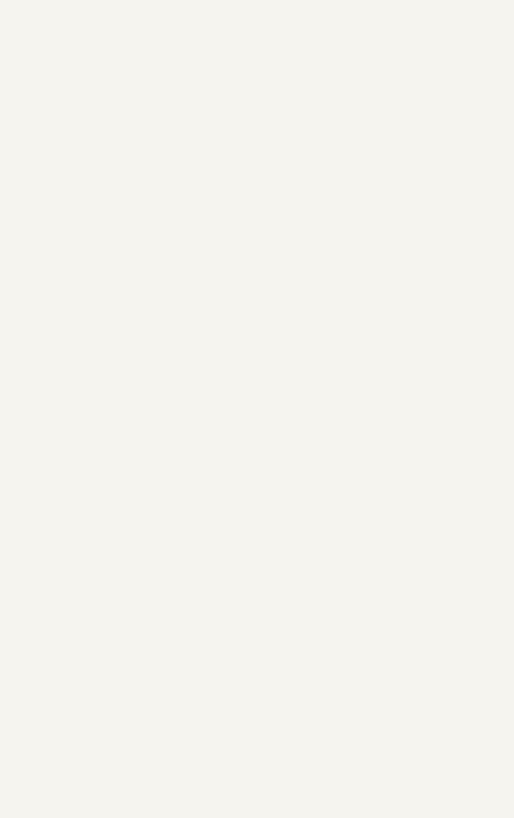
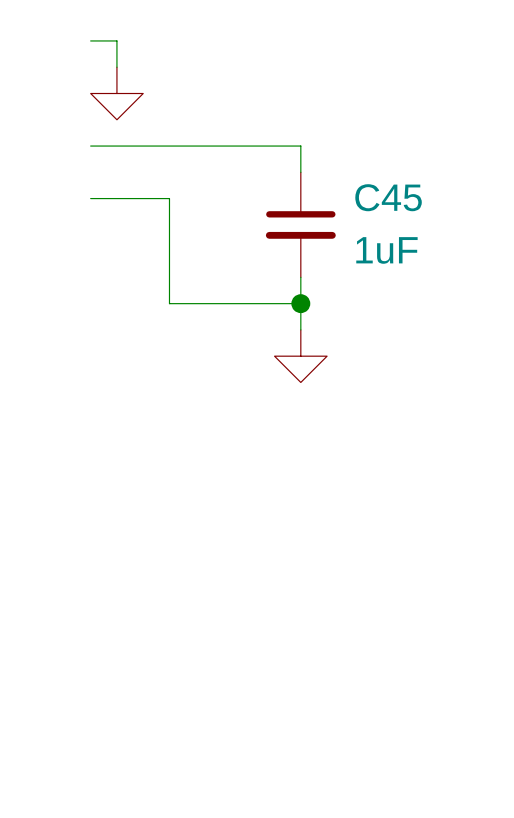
wire: none -> (90, 40) (116, 40) (116, 67)
power symbol: none -> (116, 93)
wire: none -> (90, 146) (300, 146) (300, 172)
wire: none -> (90, 198) (169, 198) (169, 303) (300, 303)
C45: none -> 1uF (300, 224)
wire: none -> (300, 277) (300, 329)
junction: none -> (300, 303)
power symbol: none -> (300, 356)

